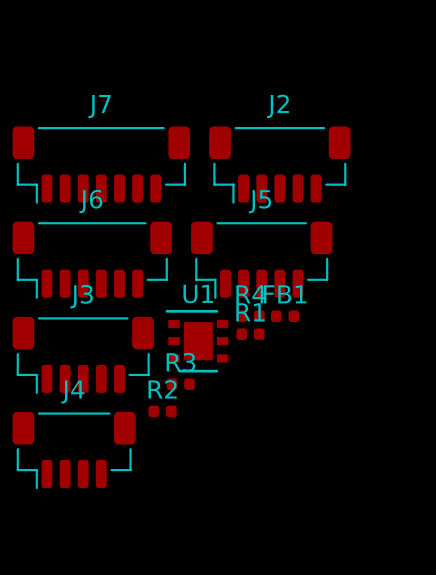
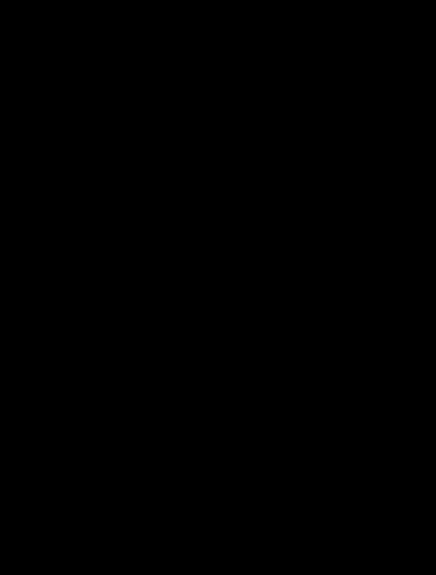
J7: (101, 165) -> none
J2: (279, 165) -> none
J6: (92, 260) -> none
J5: (261, 260) -> none
R4: (250, 316) -> none
FB1: (285, 316) -> none
R1: (250, 334) -> none
U1: (196, 341) -> none
J3: (83, 355) -> none
R3: (180, 384) -> none
R2: (162, 411) -> none
J4: (74, 450) -> none

